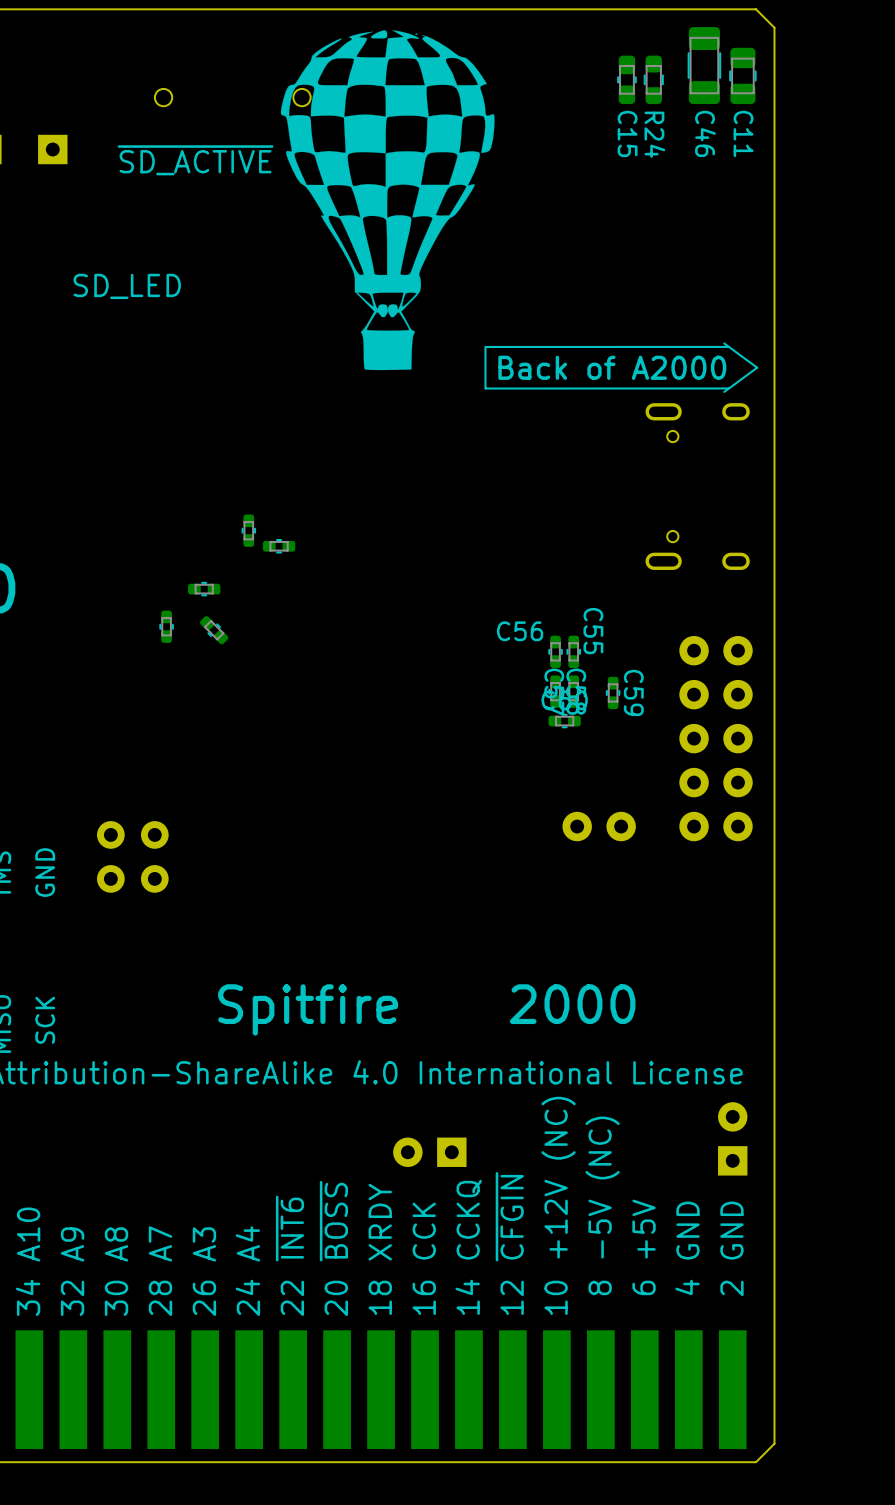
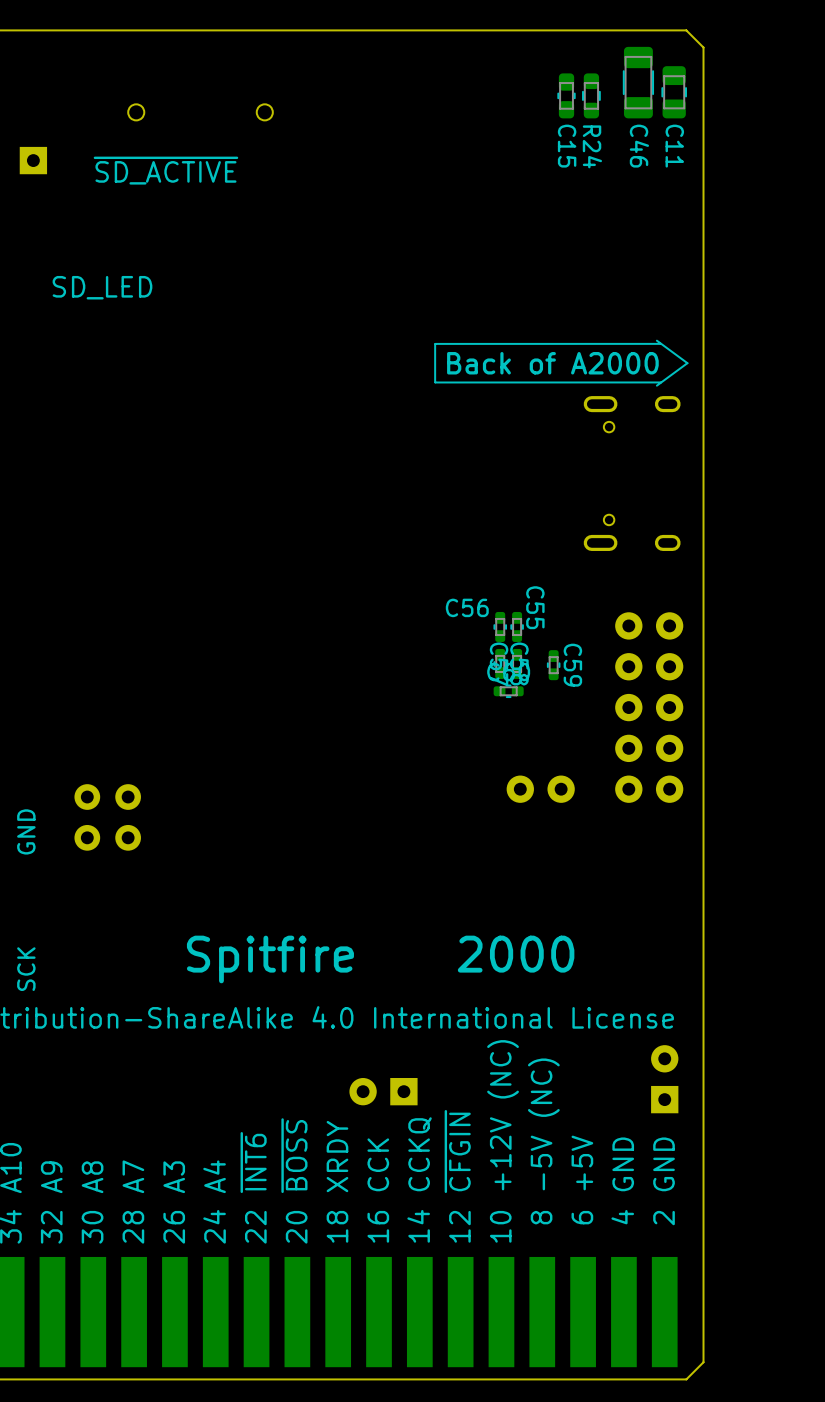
drawing: [280, 30, 495, 371] -> none
part: (248, 530) -> none
part: (279, 546) -> none
part: (204, 589) -> none
part: (166, 626) -> none
part: (214, 630) -> none

